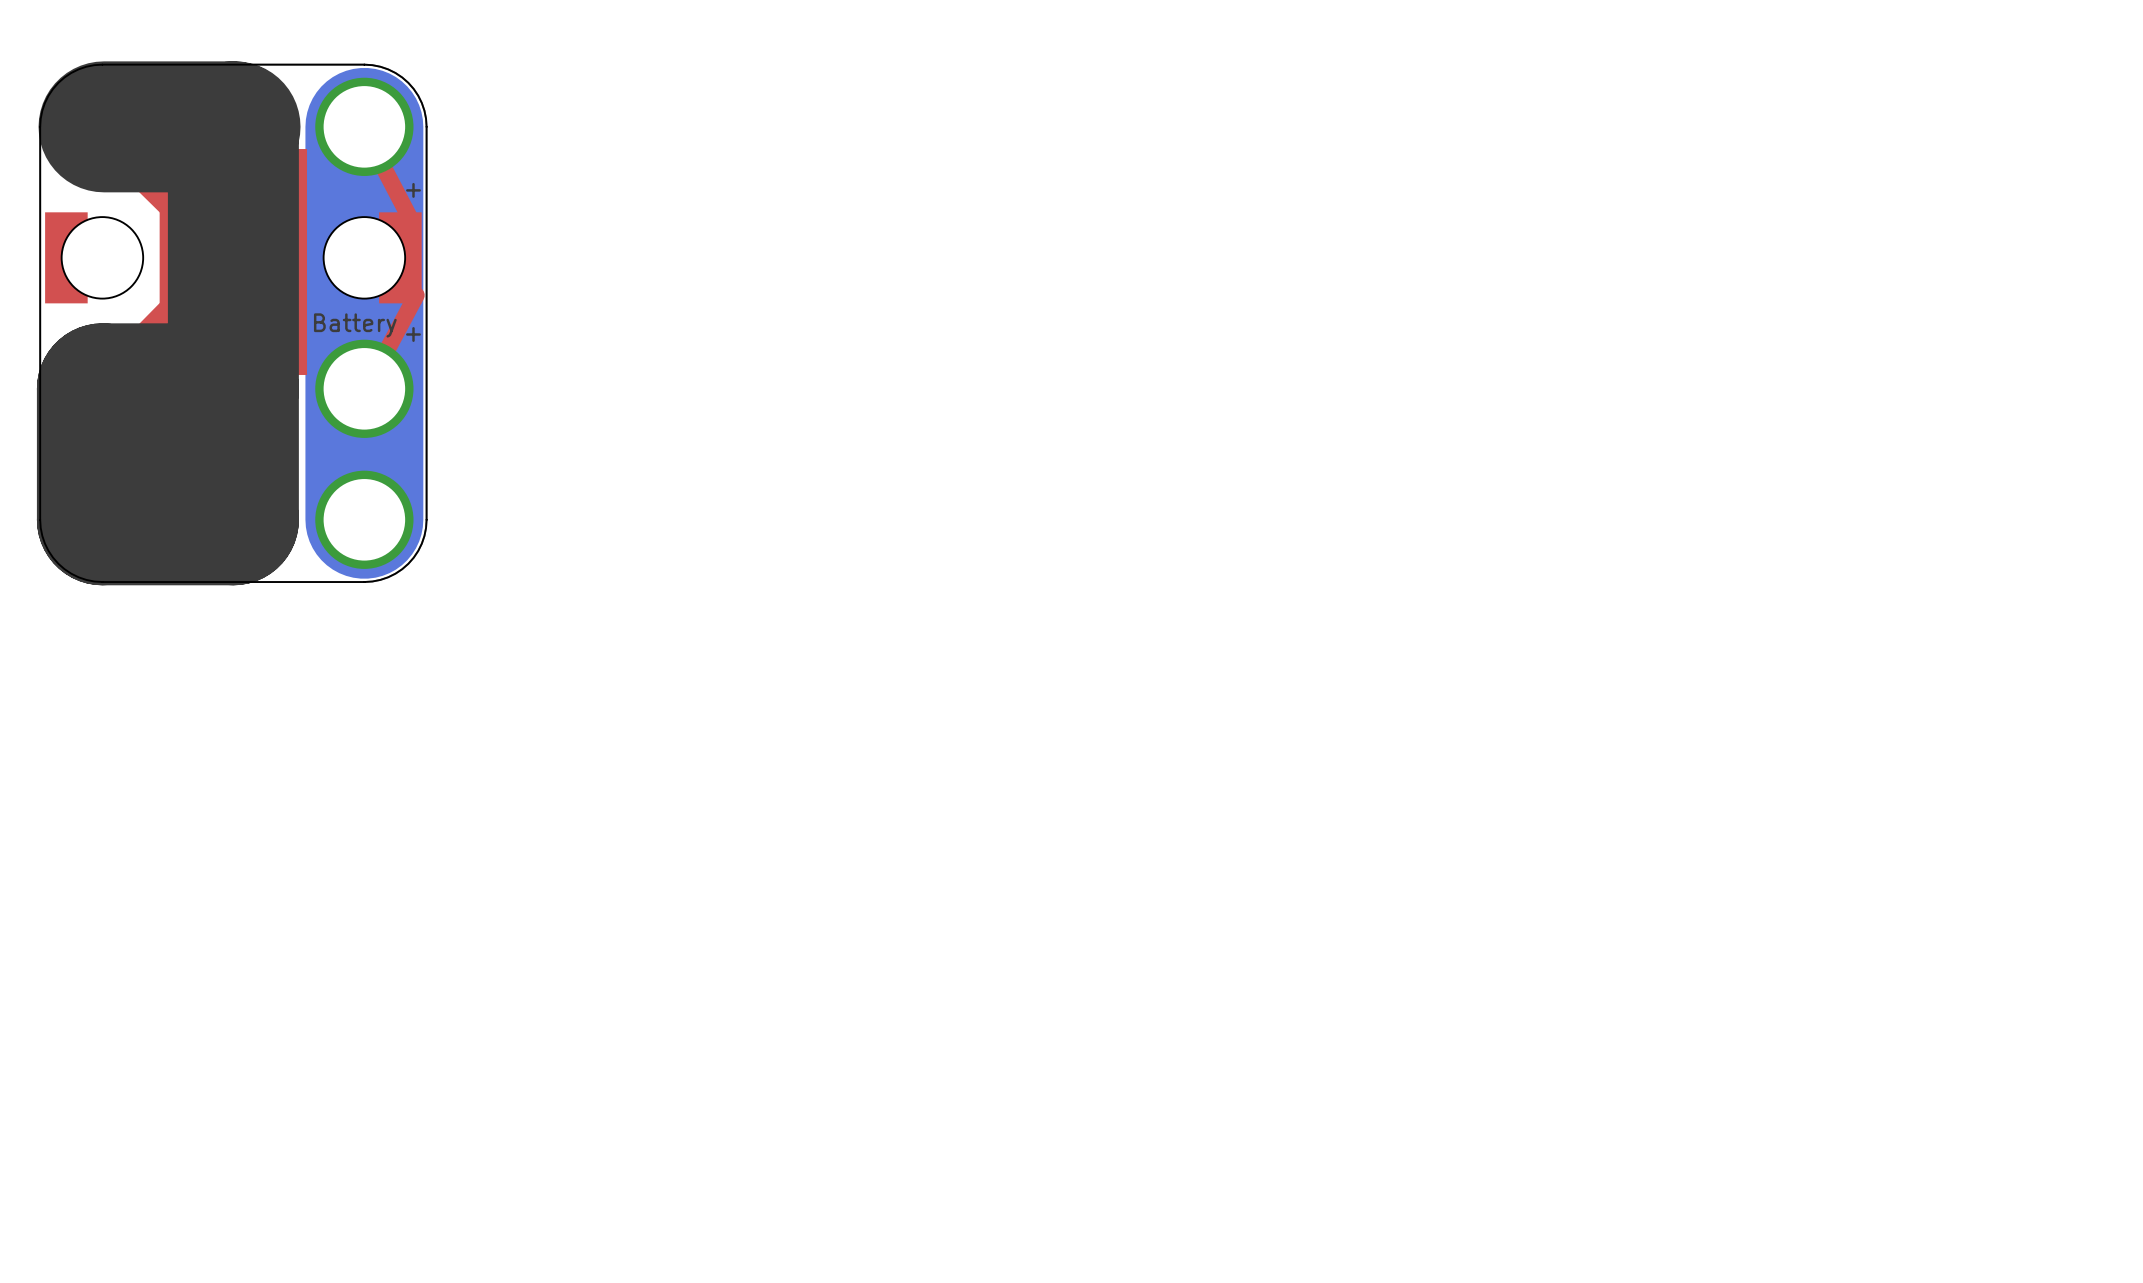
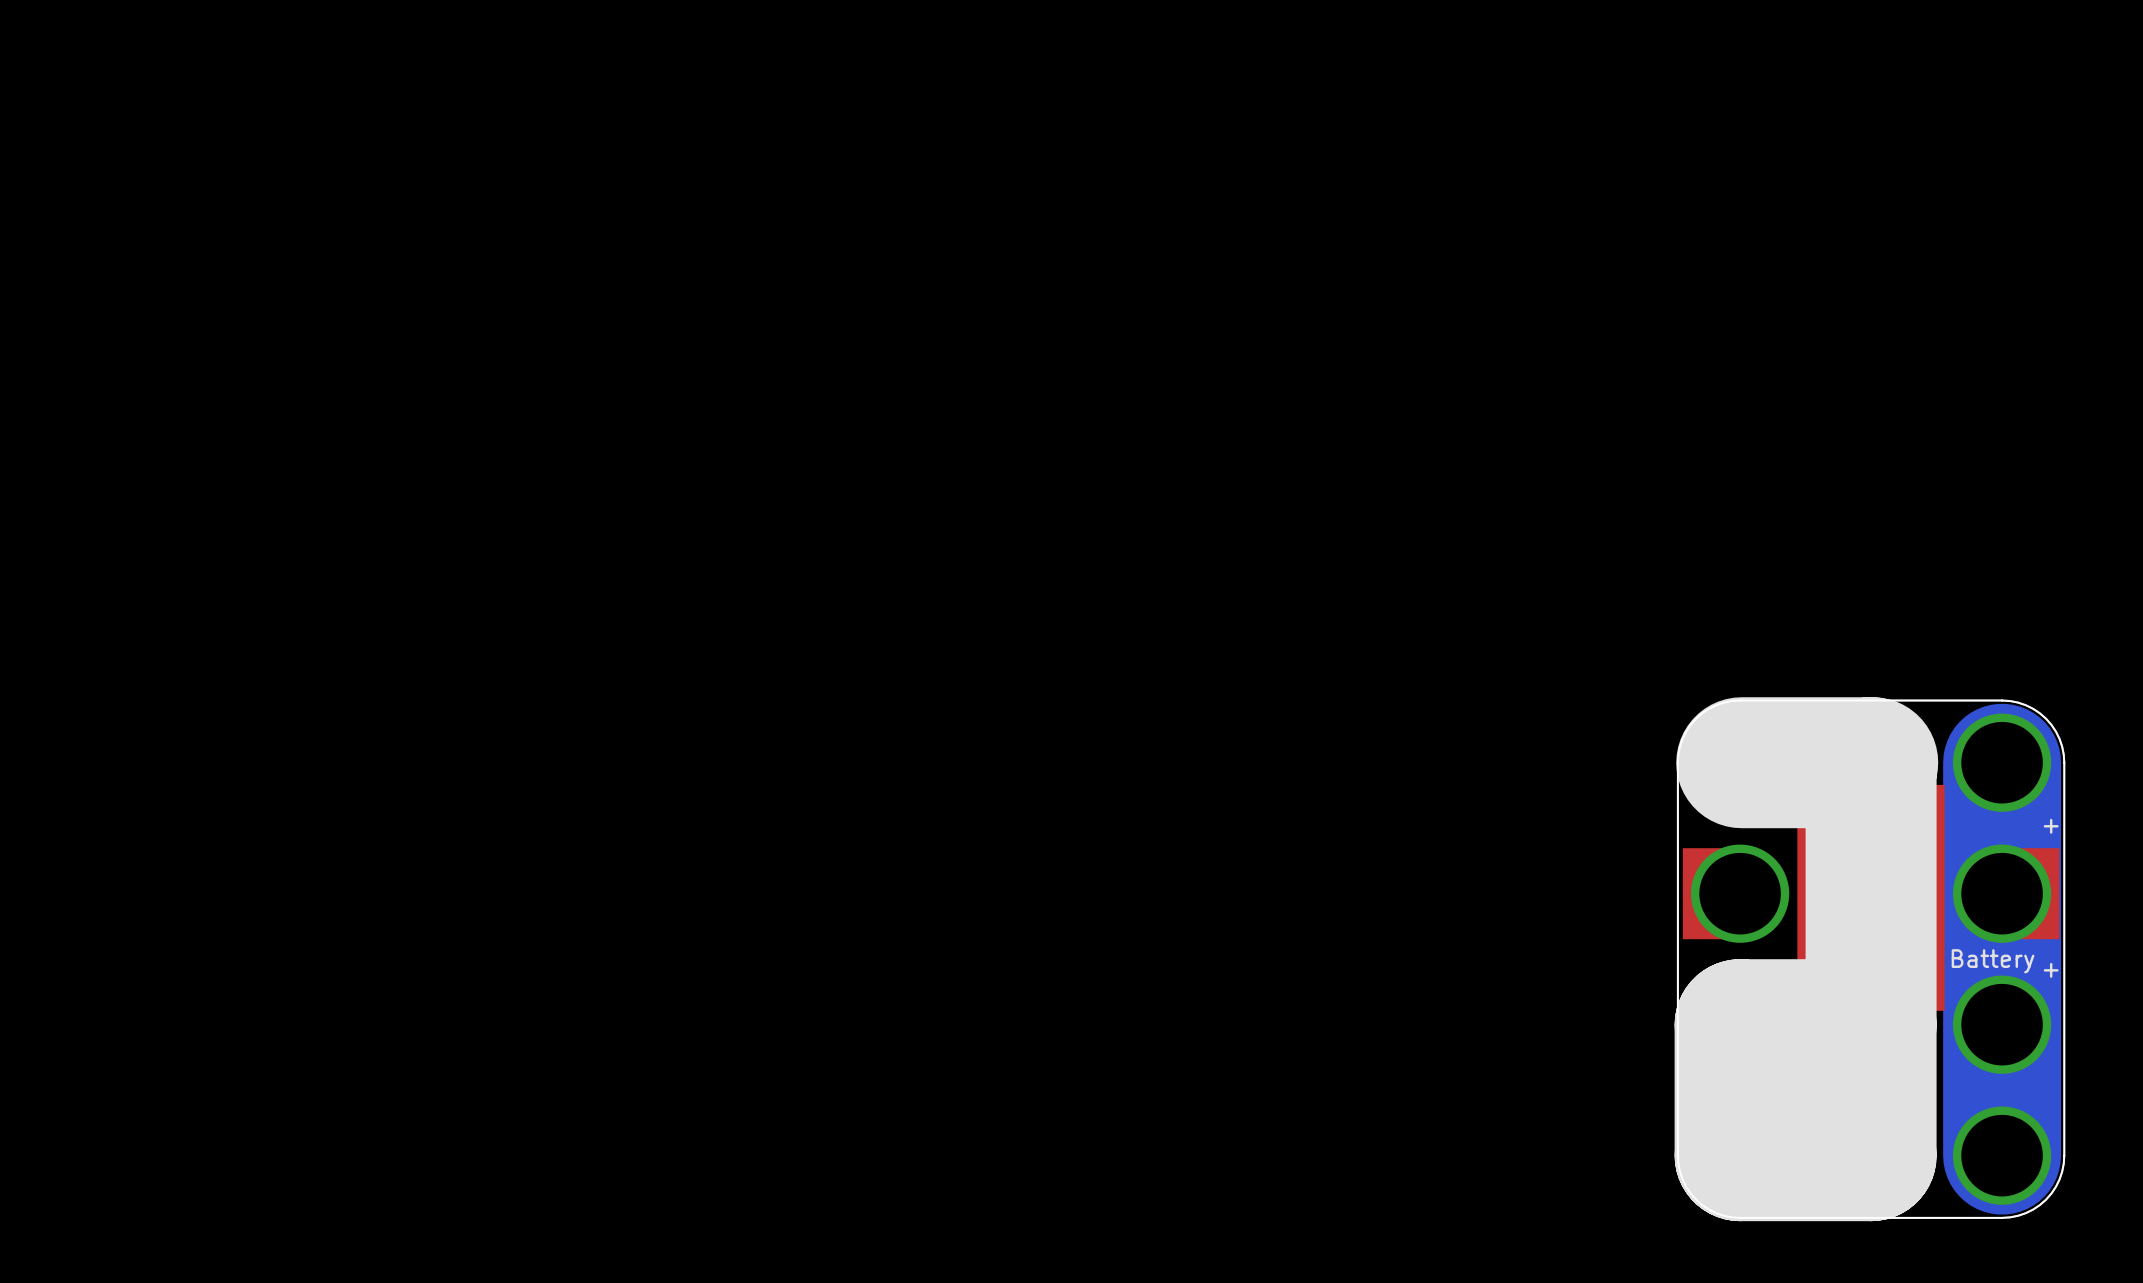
part footprint: [36, 61, 428, 586] -> [1674, 697, 2065, 1222]

